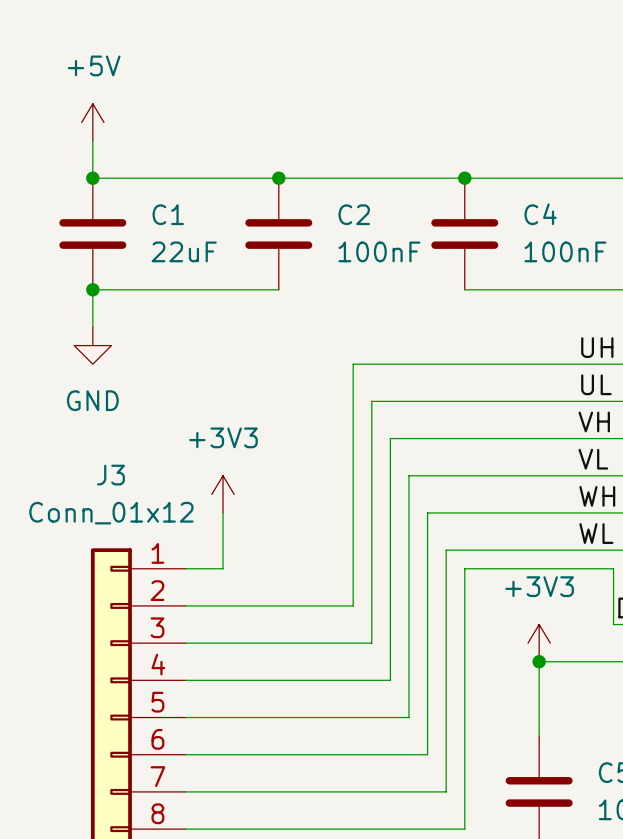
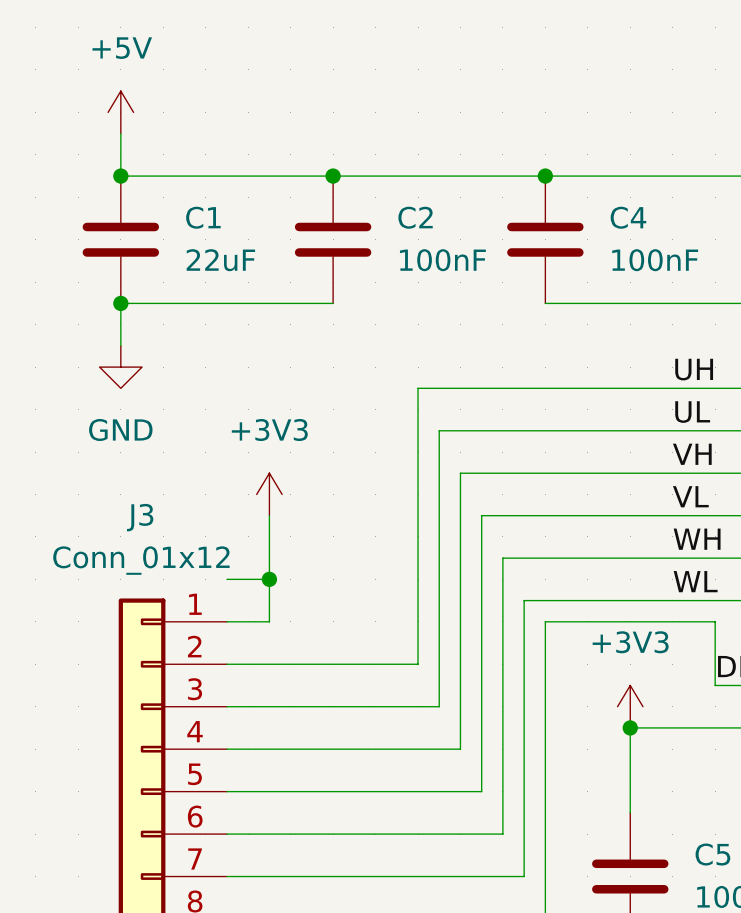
power symbol position: +3V3 (223, 494) -> +3V3 (269, 494)
wire: none -> (226, 579) (269, 579)
junction: none -> (269, 579)

